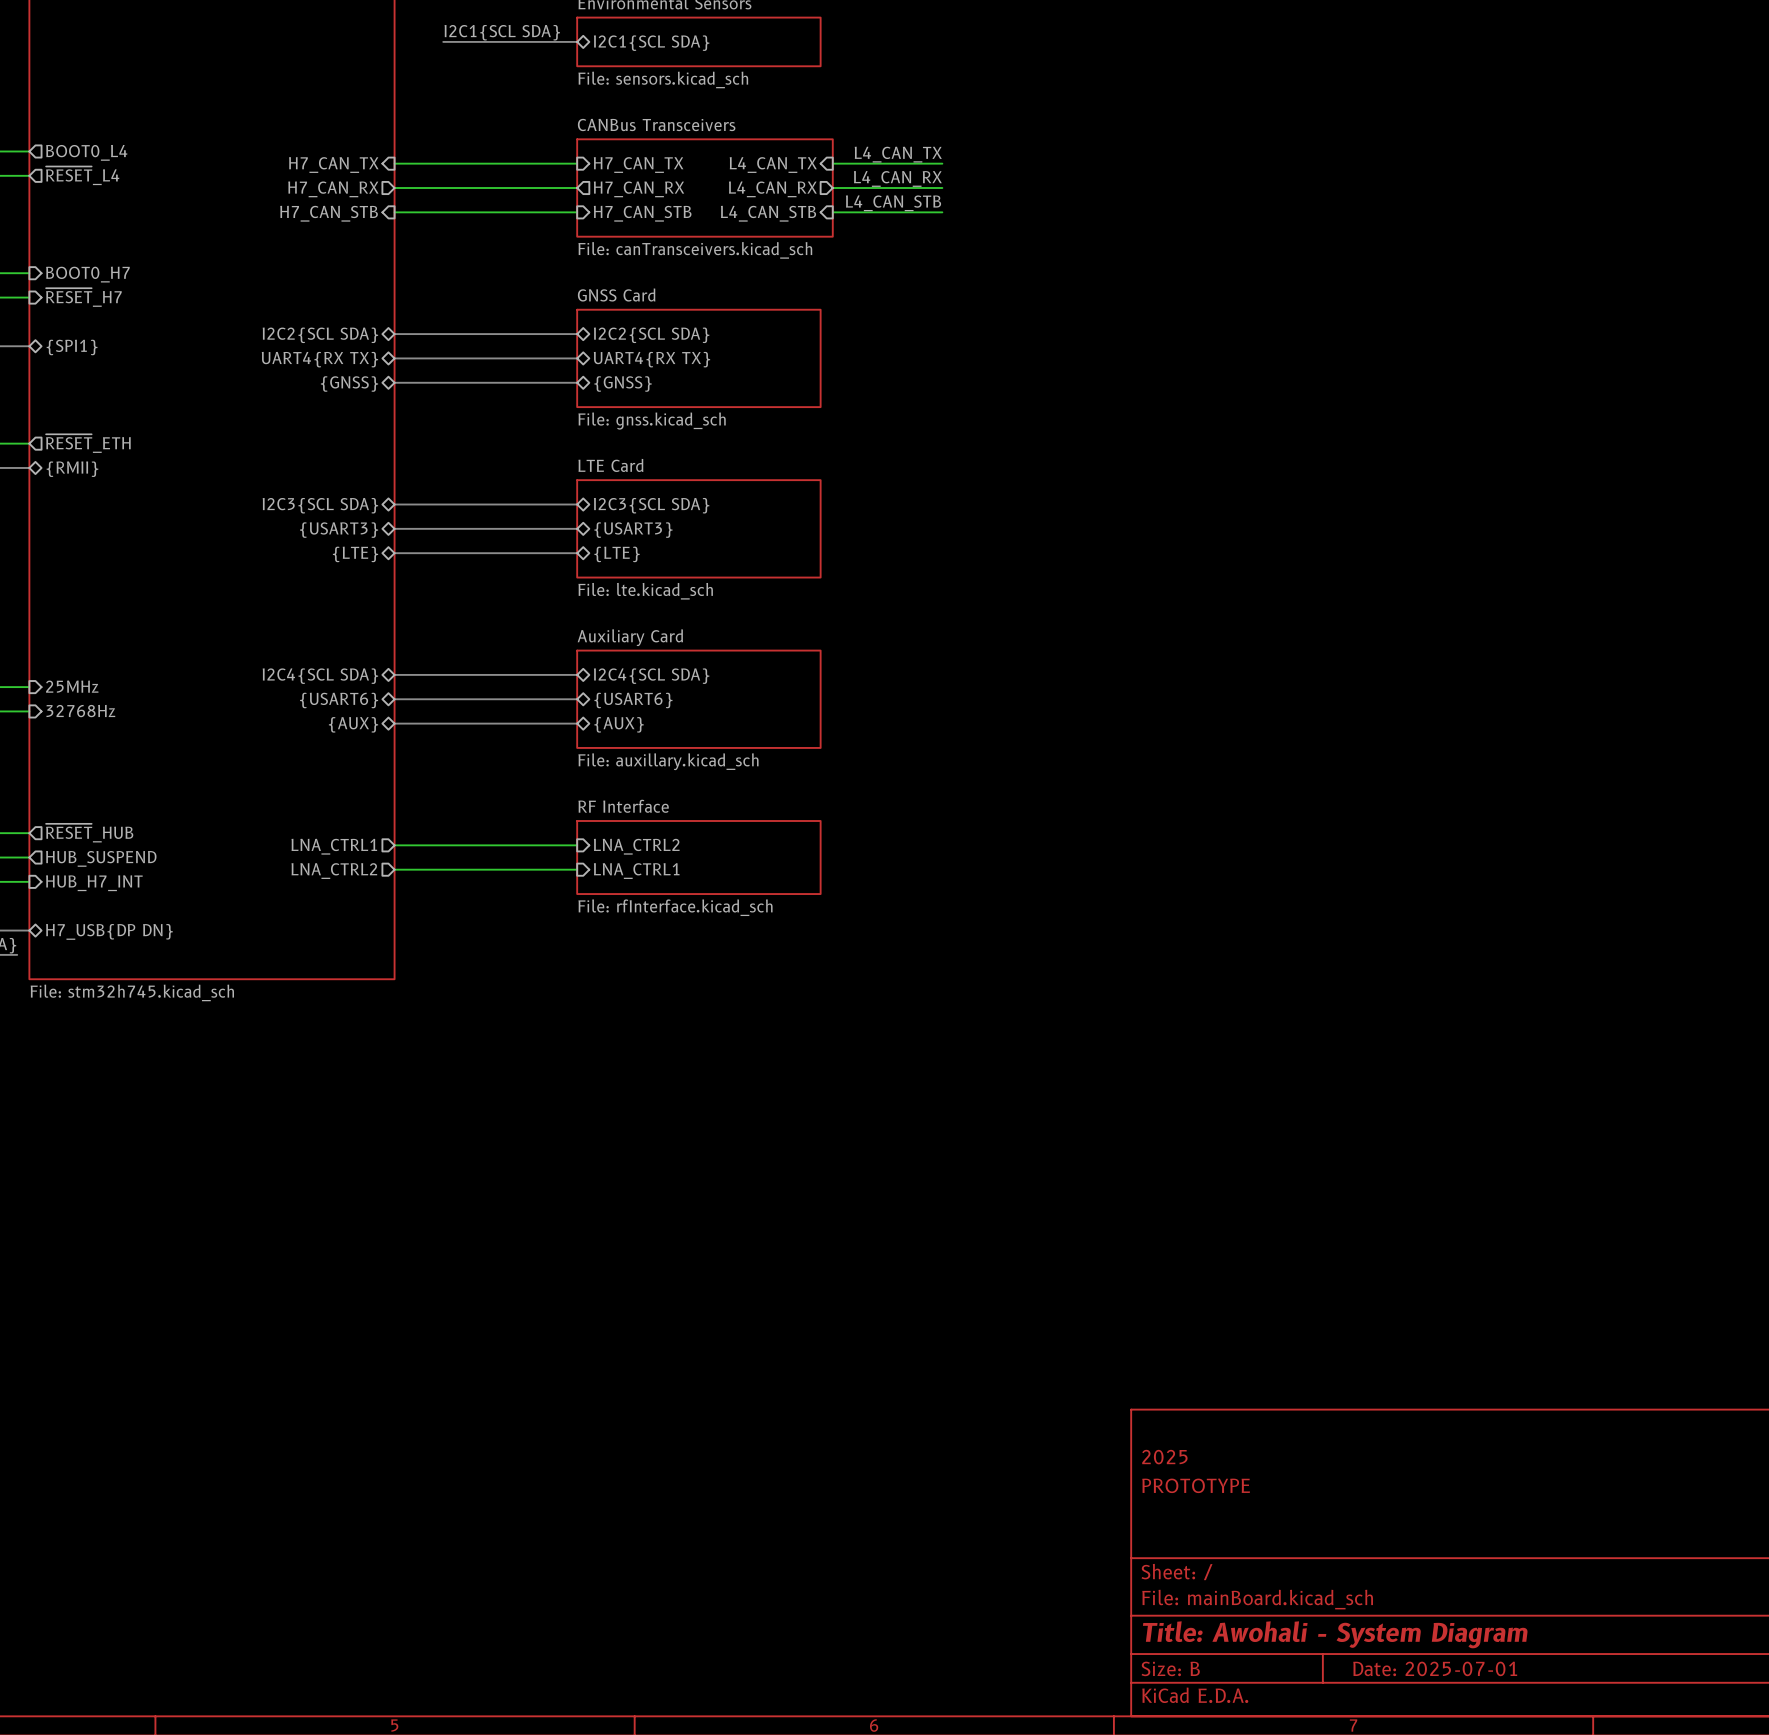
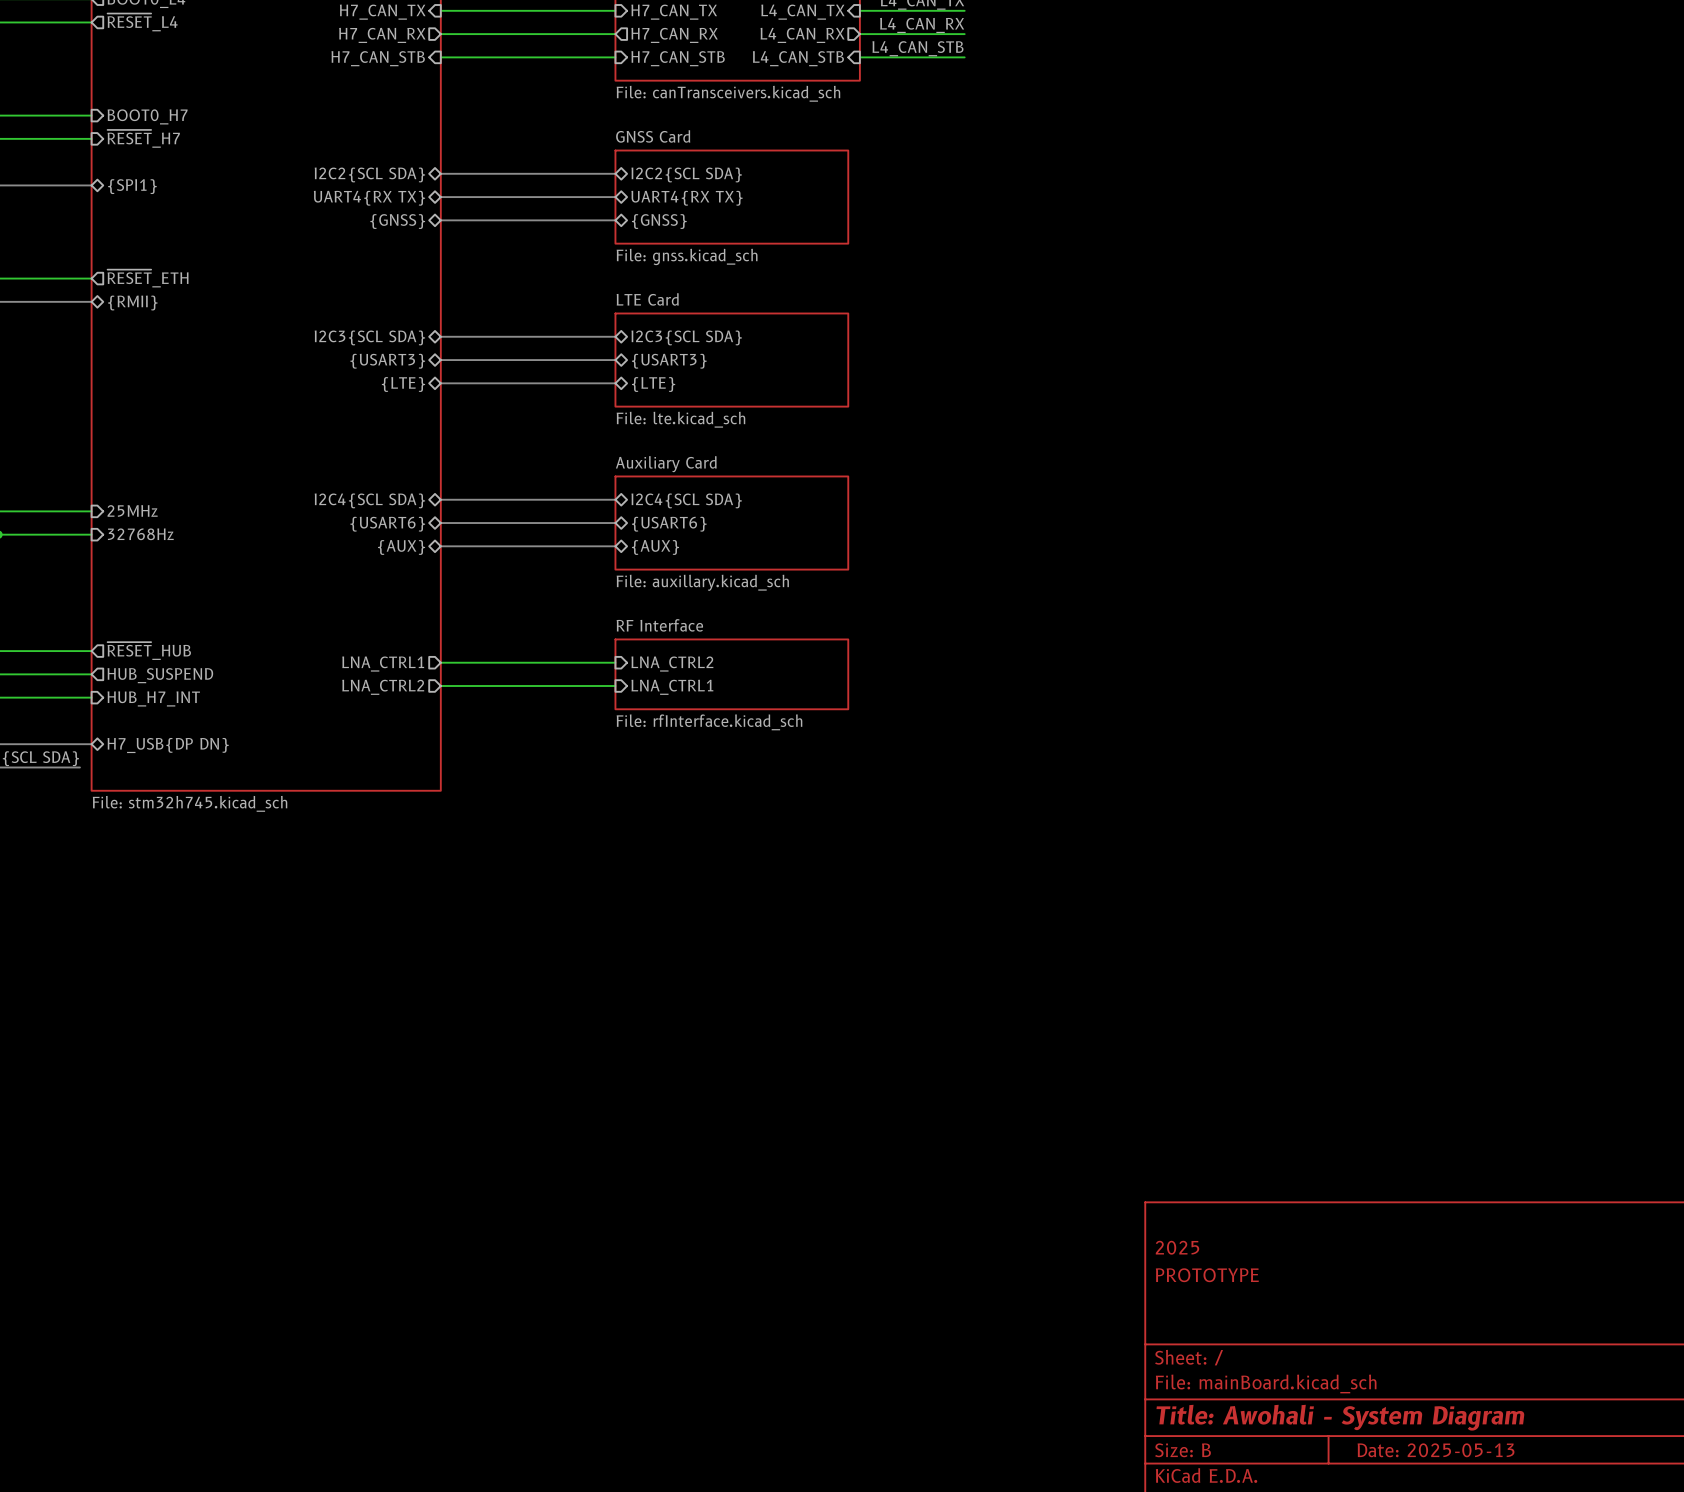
title block: Date: 2025-07-01 (1435, 1668) -> Date: 2025-05-13 (1436, 1450)

